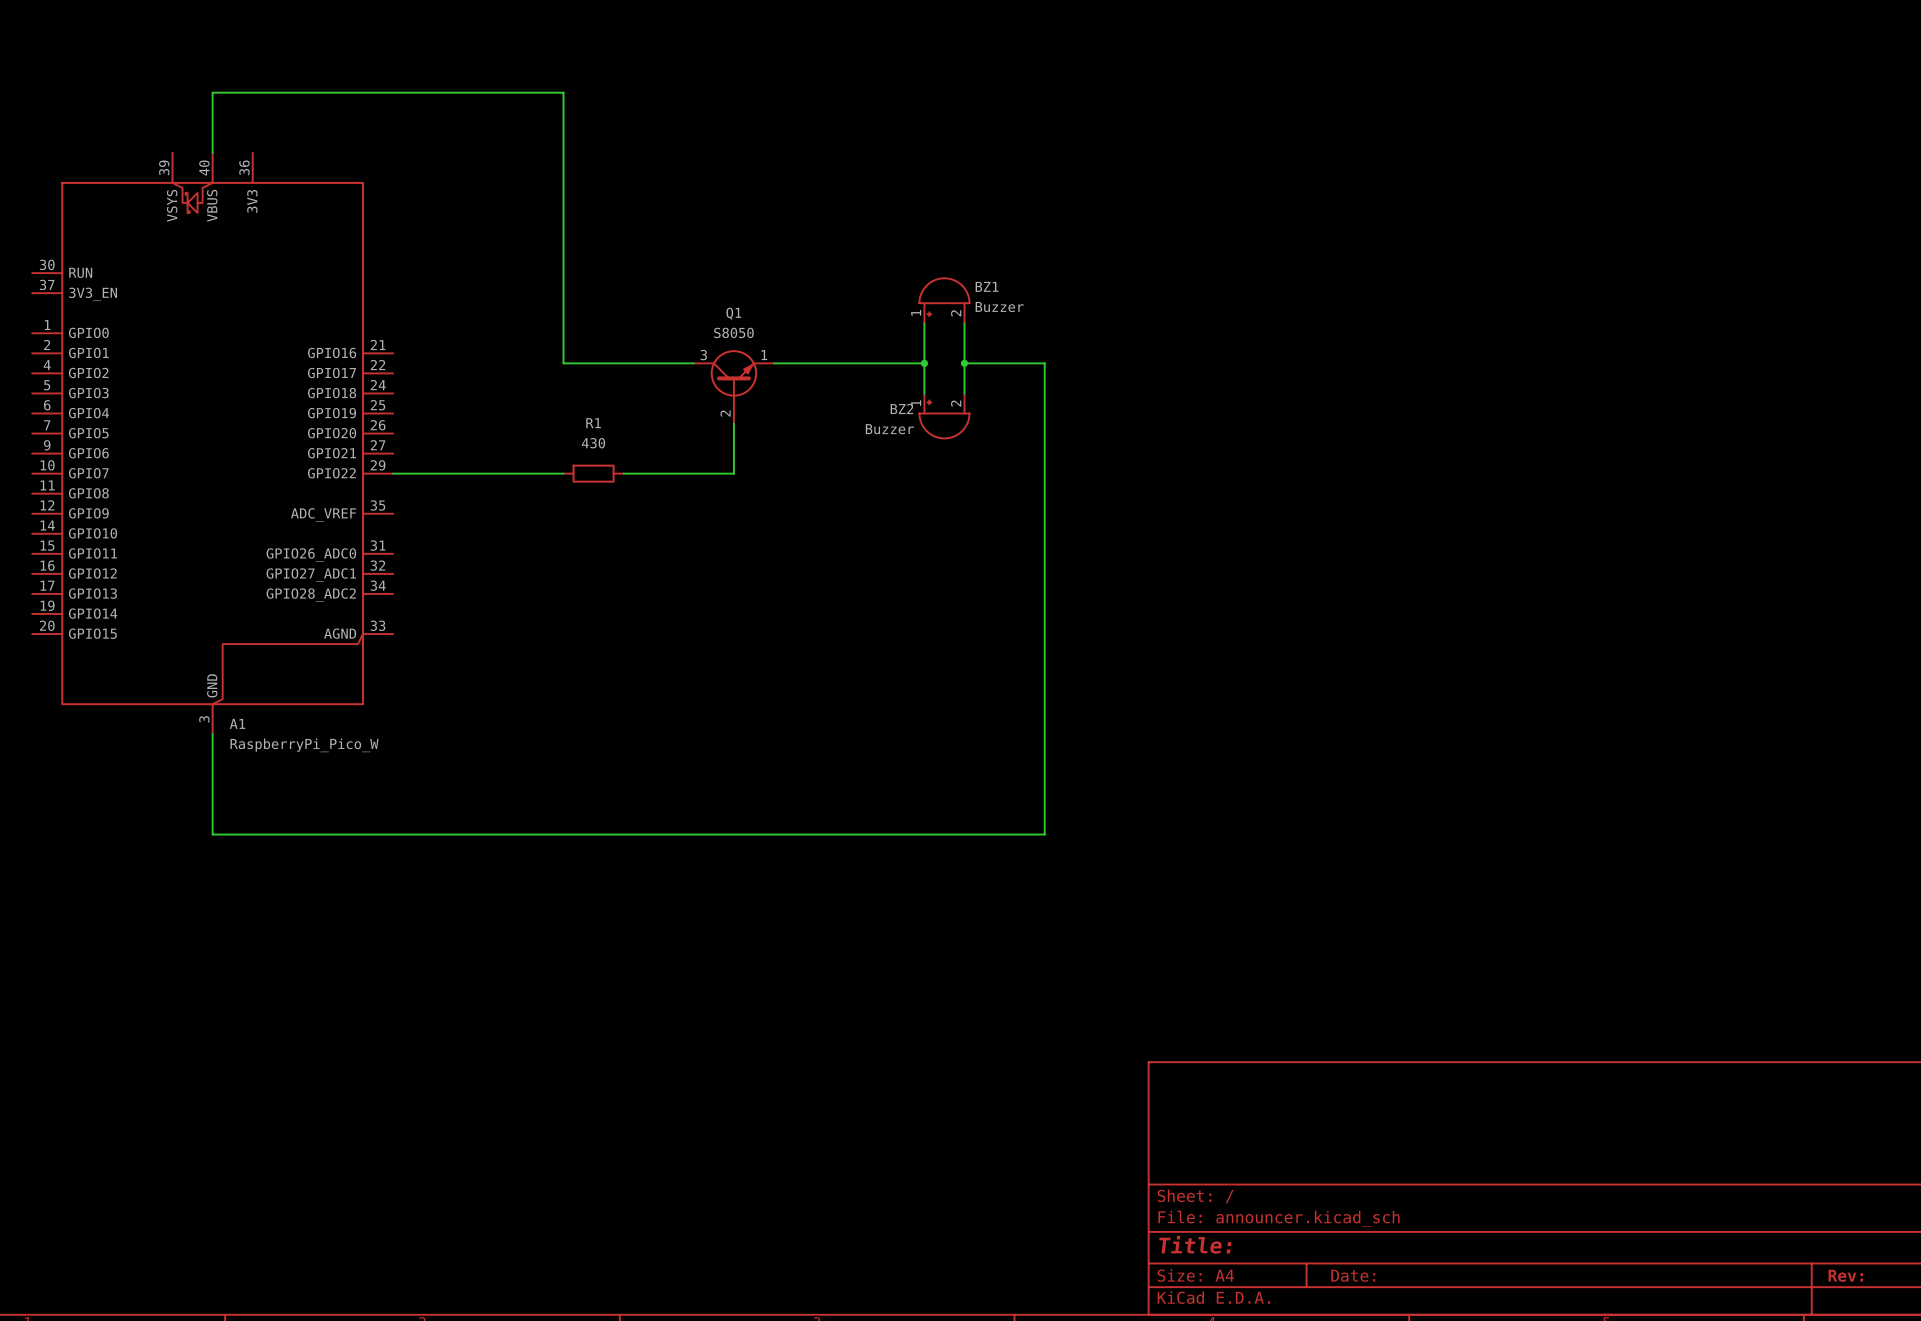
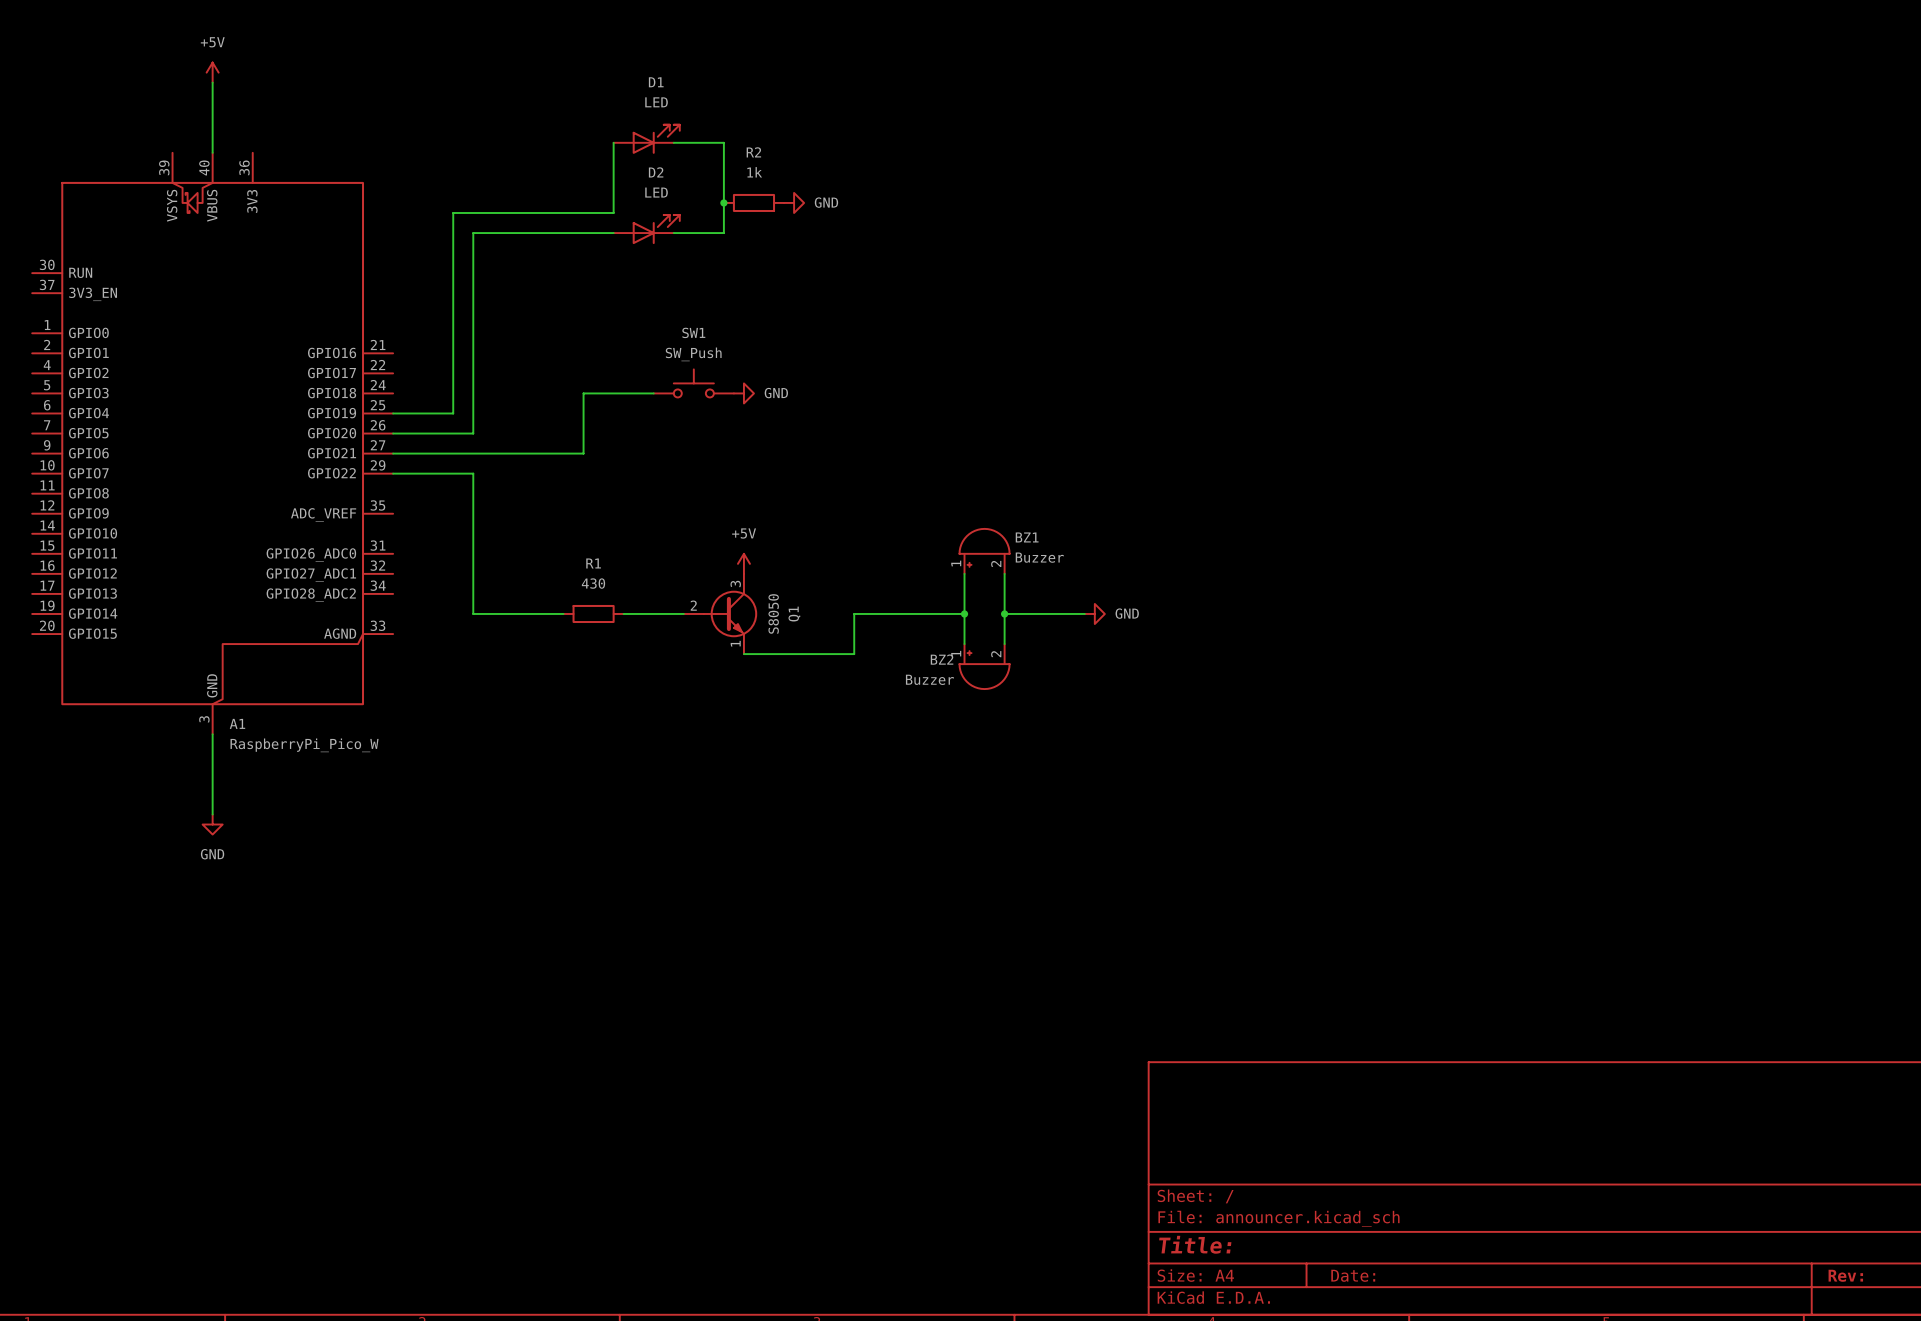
power symbol: none -> +5V (212, 72)
wire: (212, 92) (563, 92) (563, 363) (693, 363) -> (212, 92) (212, 82)
D1: none -> LED (646, 139)
wire: none -> (613, 142) (613, 212) (453, 212) (453, 413) (393, 413)
wire: none -> (673, 142) (723, 142) (723, 233) (673, 233)
junction: none -> (723, 202)
R2: none -> 1k (753, 202)
power symbol: none -> GND (794, 202)
D2: none -> LED (646, 229)
wire: none -> (613, 233) (473, 233) (473, 433) (393, 433)
BZ1 position: (944, 300) -> (984, 551)
wire: (924, 323) (924, 393) -> none
wire: (964, 323) (964, 393) -> none
wire: (774, 363) (924, 363) -> none
junction: (924, 363) -> none
wire: (964, 363) (1044, 363) (1044, 834) (212, 834) (212, 814) -> none
junction: (964, 363) -> none
Q1 rotation: 0° (733, 376) -> 90° clockwise (730, 613)
SW1: none -> SW_Push (693, 383)
Q1 position: (733, 386) -> (720, 613)
wire: none -> (653, 393) (583, 393) (583, 453) (393, 453)
power symbol: none -> GND (743, 393)
BZ2 position: (944, 415) -> (984, 666)
wire: (733, 423) (733, 473) (623, 473) -> none
wire: (473, 473) (563, 473) -> (473, 473) (473, 613) (563, 613)
R1 position: (593, 473) -> (593, 613)
power symbol: none -> +5V (743, 563)
wire: none -> (964, 573) (964, 644)
wire: none -> (1004, 573) (1004, 644)
wire: none -> (623, 613) (683, 613)
wire: none -> (964, 613) (854, 613) (854, 654) (743, 654)
junction: none -> (964, 613)
wire: none -> (1004, 613) (1084, 613)
junction: none -> (1004, 613)
power symbol: none -> GND (1094, 613)
power symbol: none -> GND (212, 824)

